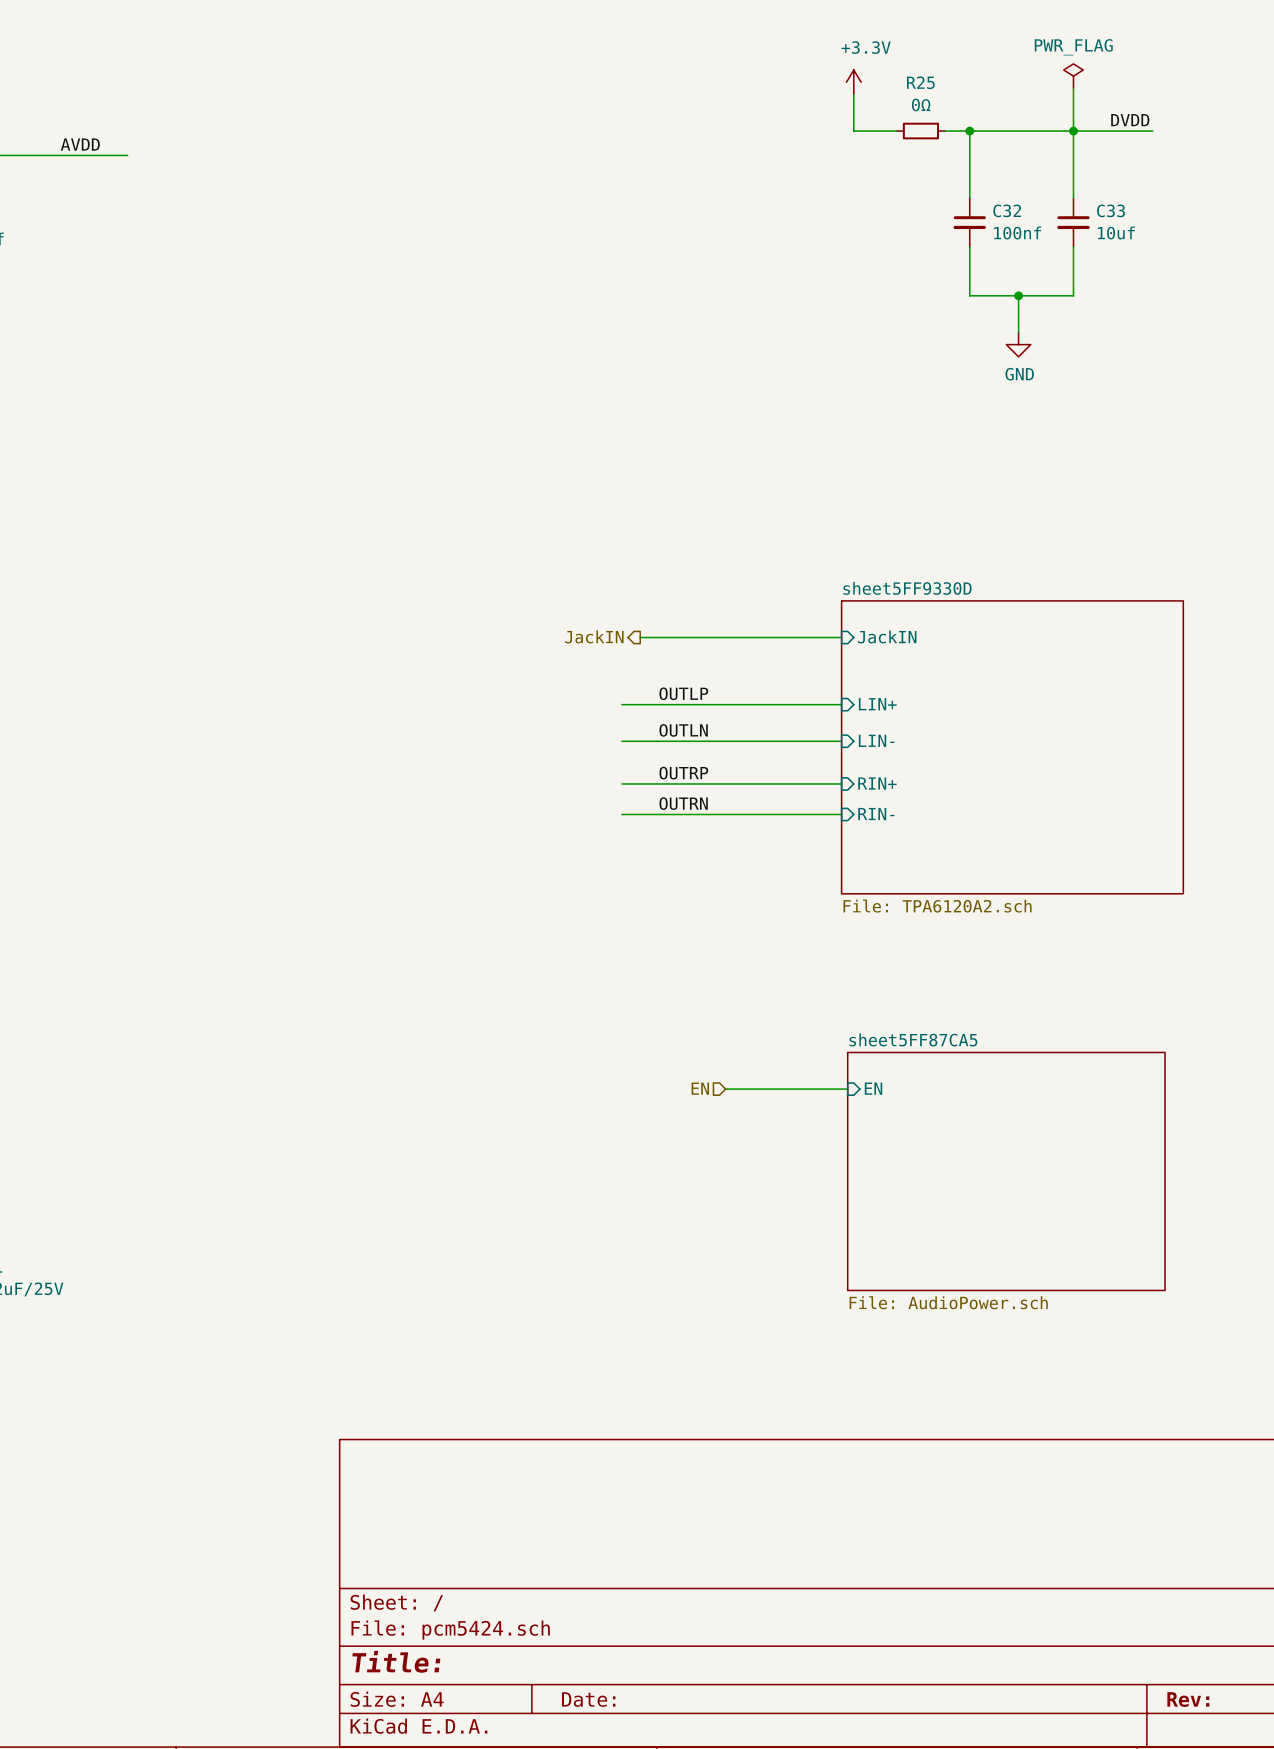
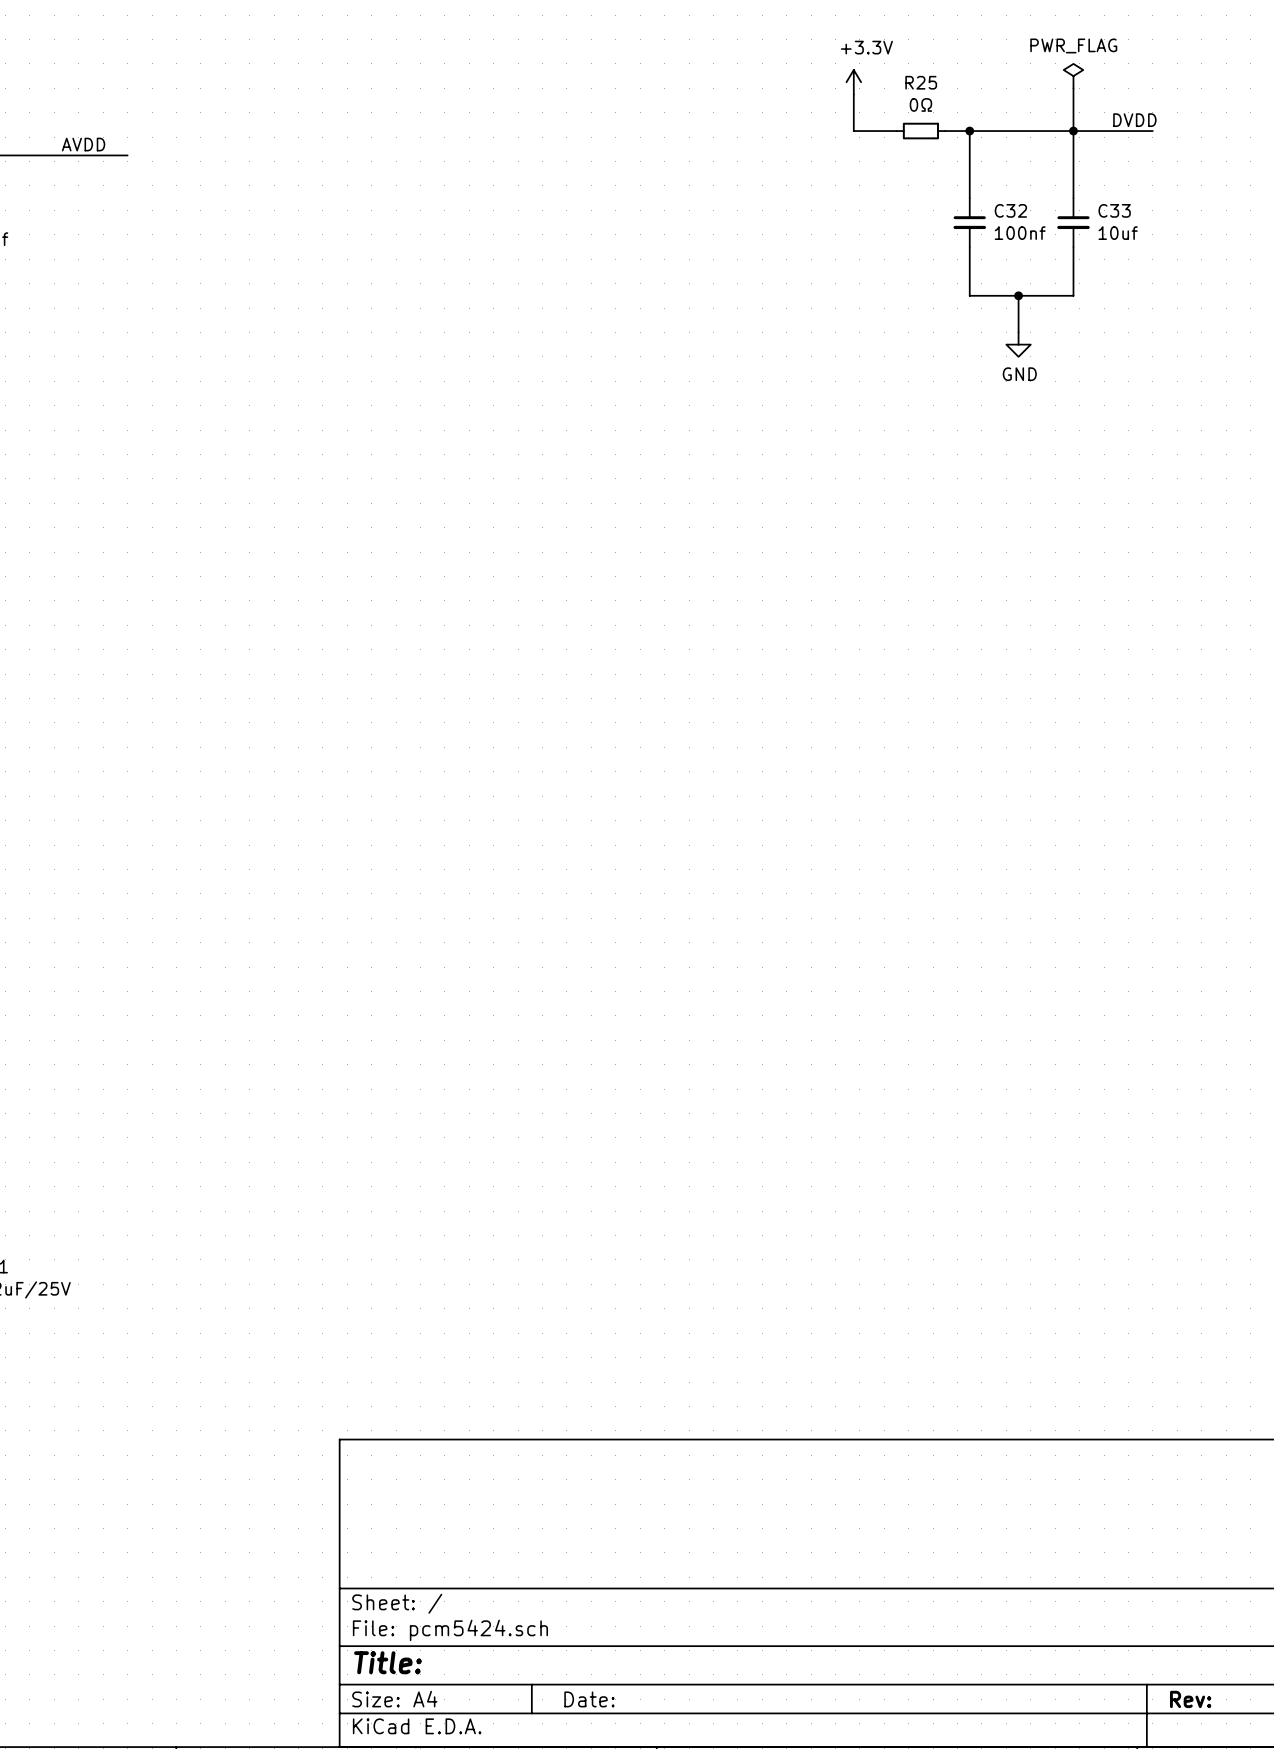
hierarchical label: JackIN (594, 636) -> none
sheet pin: JackIN (887, 636) -> none
wire: (640, 637) (841, 637) -> none
label: OUTLP (683, 693) -> none
wire: (621, 704) (841, 704) -> none
sheet pin: LIN+ (877, 704) -> none
label: OUTLN (683, 730) -> none
sheet pin: LIN- (876, 740) -> none
wire: (621, 741) (841, 741) -> none
sheet sheet5FF9330D: File: TPA6120A2.sch (1012, 747) -> none
label: OUTRP (683, 773) -> none
wire: (621, 783) (841, 783) -> none
sheet pin: RIN+ (877, 783) -> none
label: OUTRN (683, 803) -> none
wire: (621, 814) (841, 814) -> none
sheet pin: RIN- (876, 814) -> none
hierarchical label: EN (700, 1088) -> none
sheet pin: EN (873, 1088) -> none
wire: (725, 1089) (847, 1089) -> none
sheet sheet5FF87CA5: File: AudioPower.sch (1006, 1171) -> none

